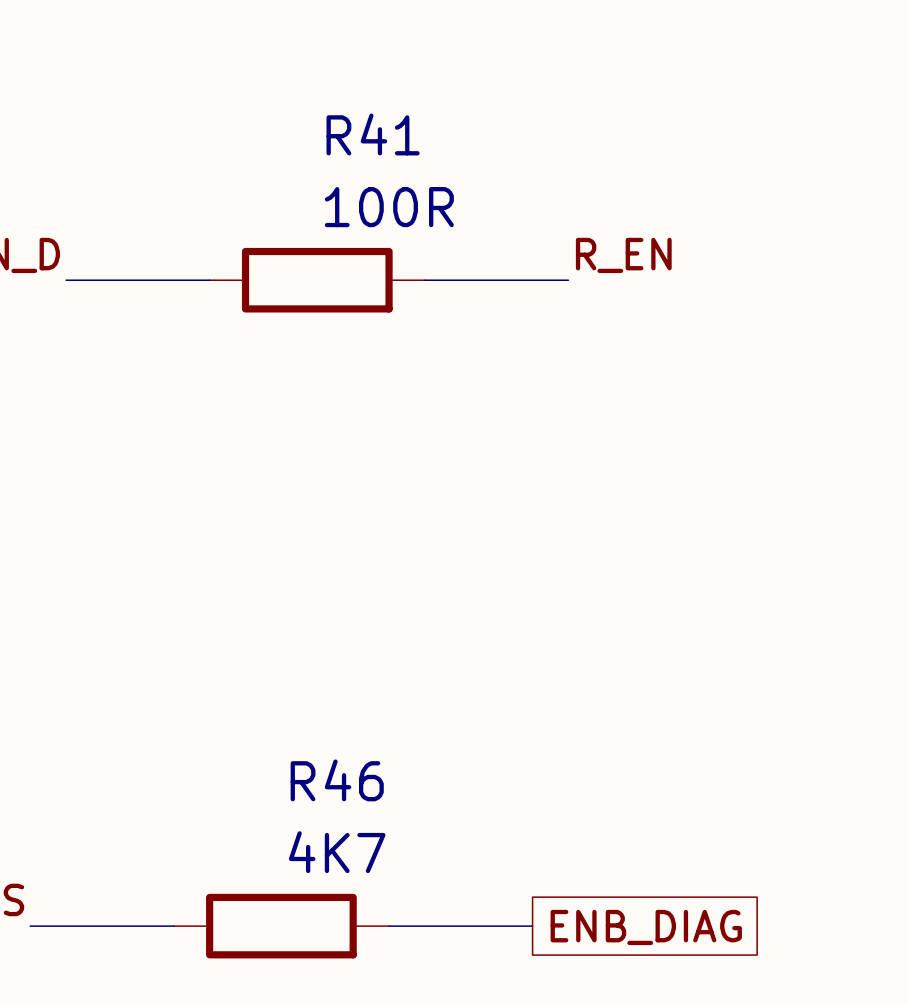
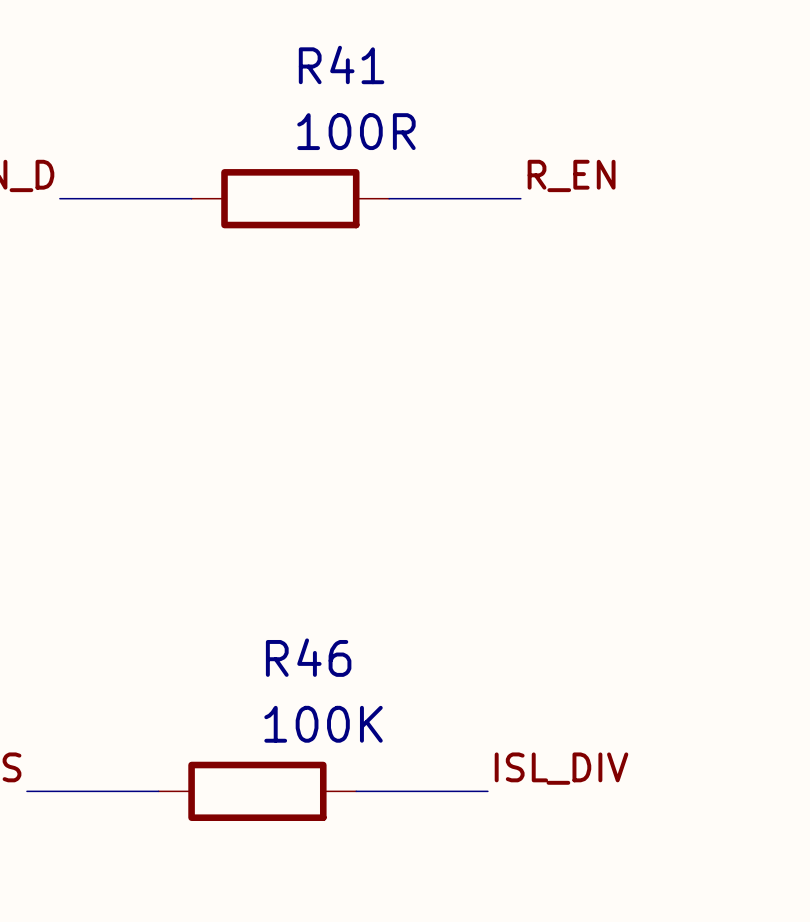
R46 value: 4K7 (337, 852) -> 100K (323, 724)
label: none -> ISL_DIV (561, 768)
global label: ENB_DIAG (646, 927) -> none

